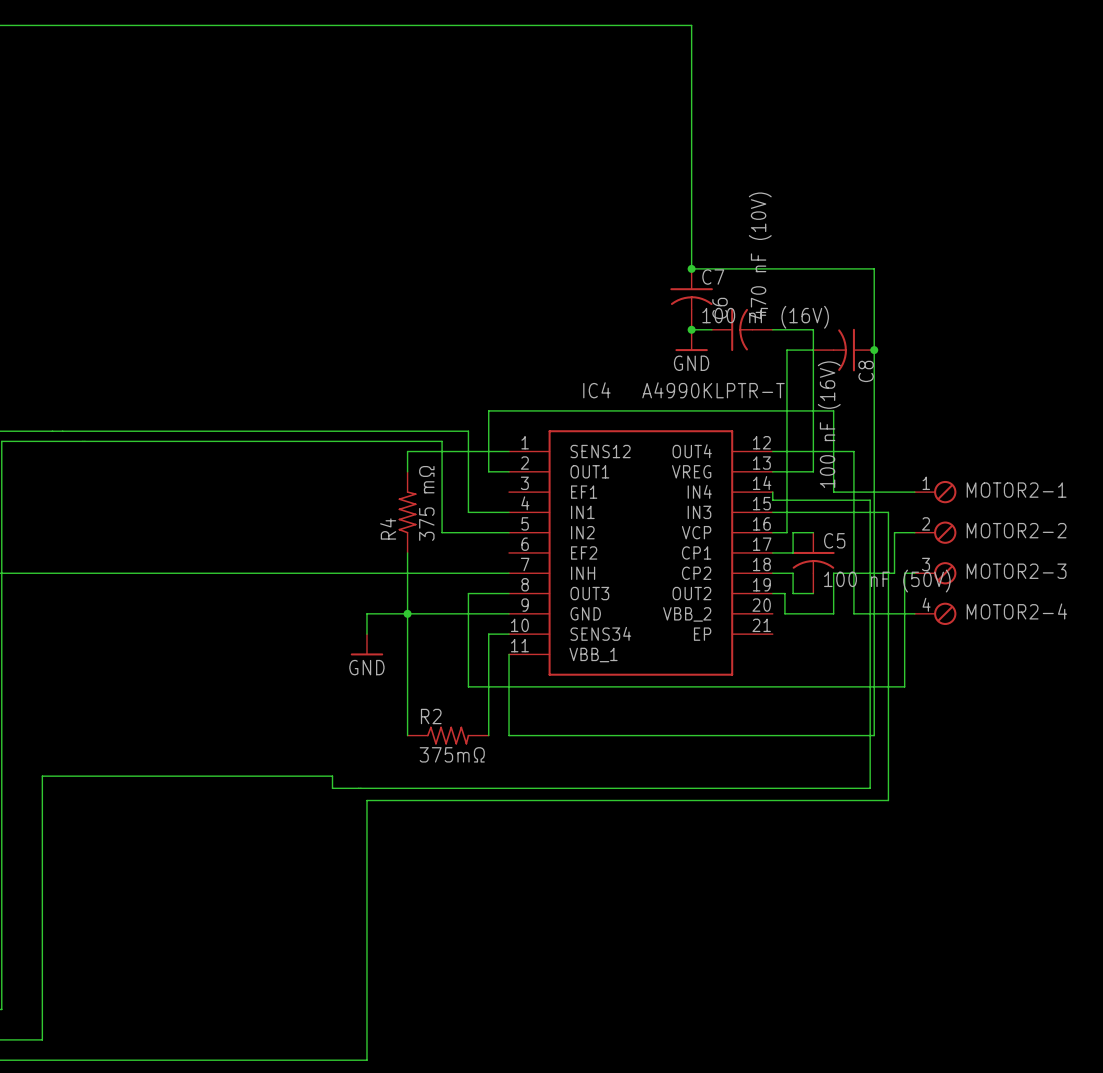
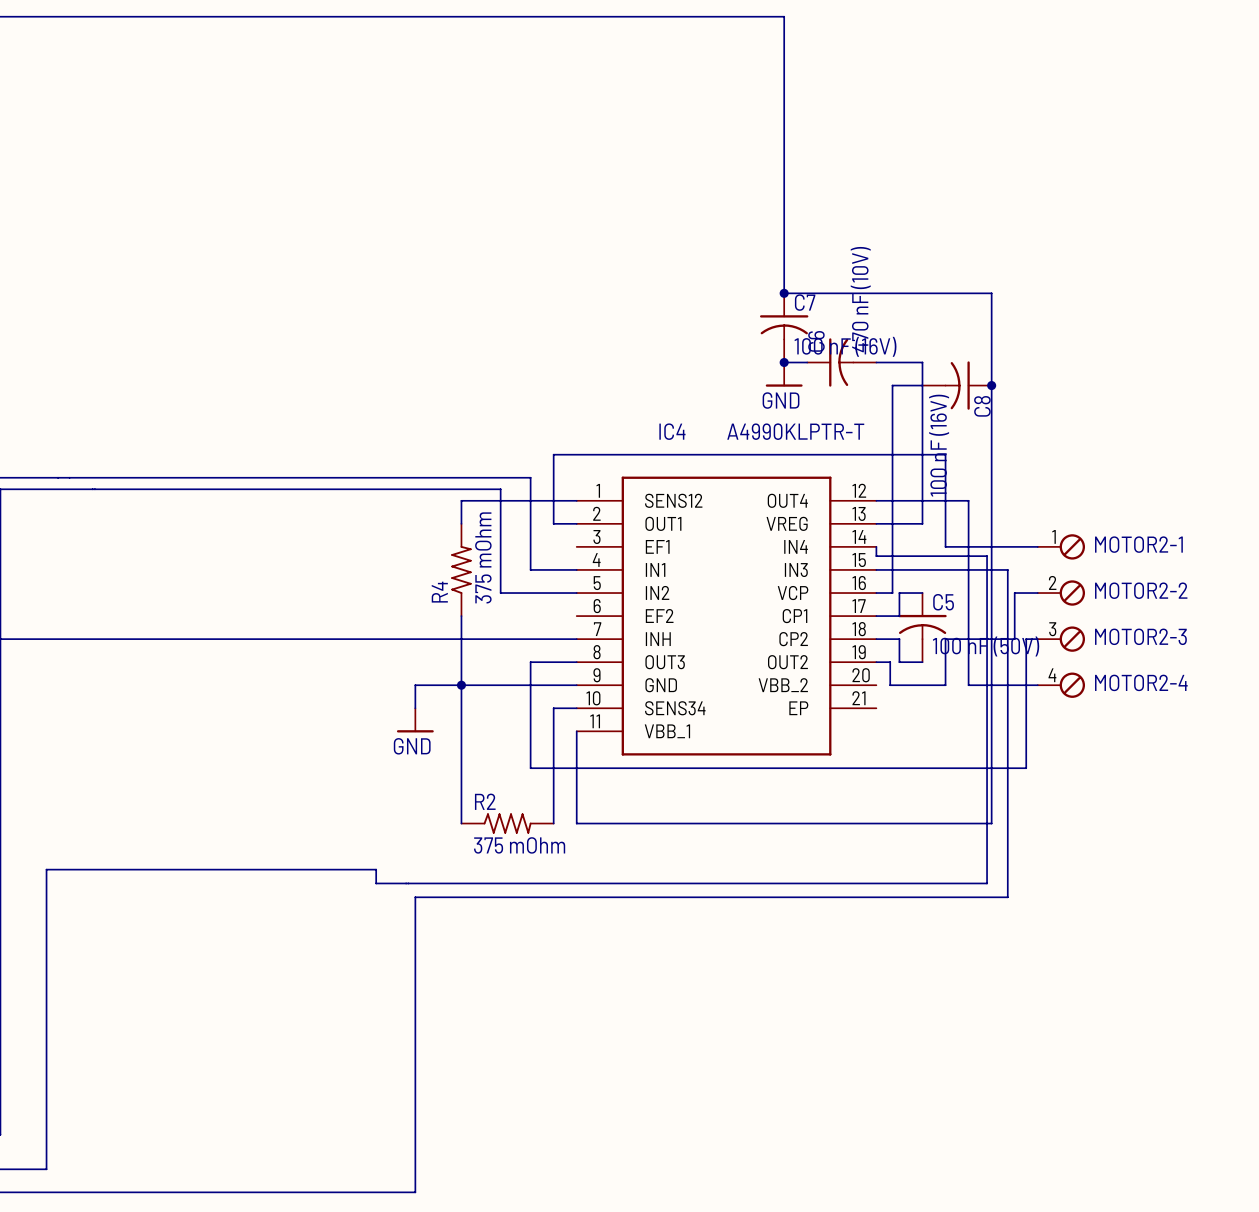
R4 value: 375 mΩ (426, 503) -> 375 mOhm (483, 557)
R2 value: 375mΩ (452, 754) -> 375 mOhm (519, 845)

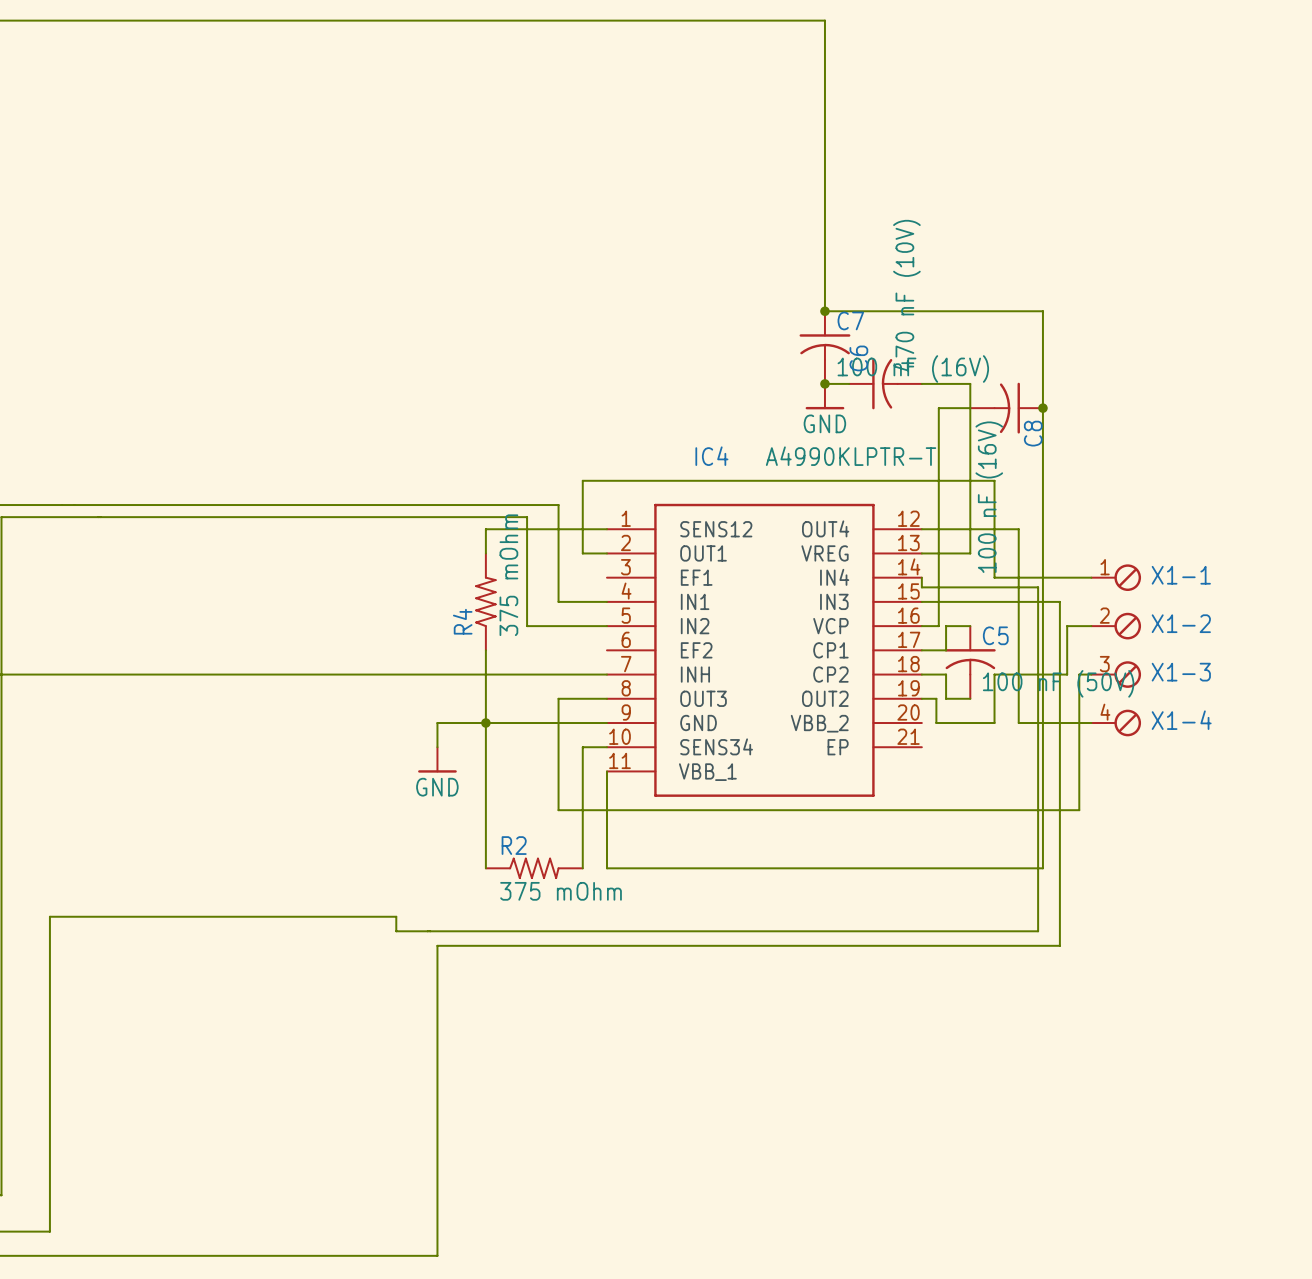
MOTOR2-1 name: MOTOR2-1 (1138, 544) -> X1-1 (1181, 575)
MOTOR2-2 name: MOTOR2-2 (1141, 590) -> X1-2 (1181, 623)
MOTOR2-3 name: MOTOR2-3 (1140, 636) -> X1-3 (1181, 672)
MOTOR2-4 name: MOTOR2-4 (1141, 682) -> X1-4 (1181, 720)

